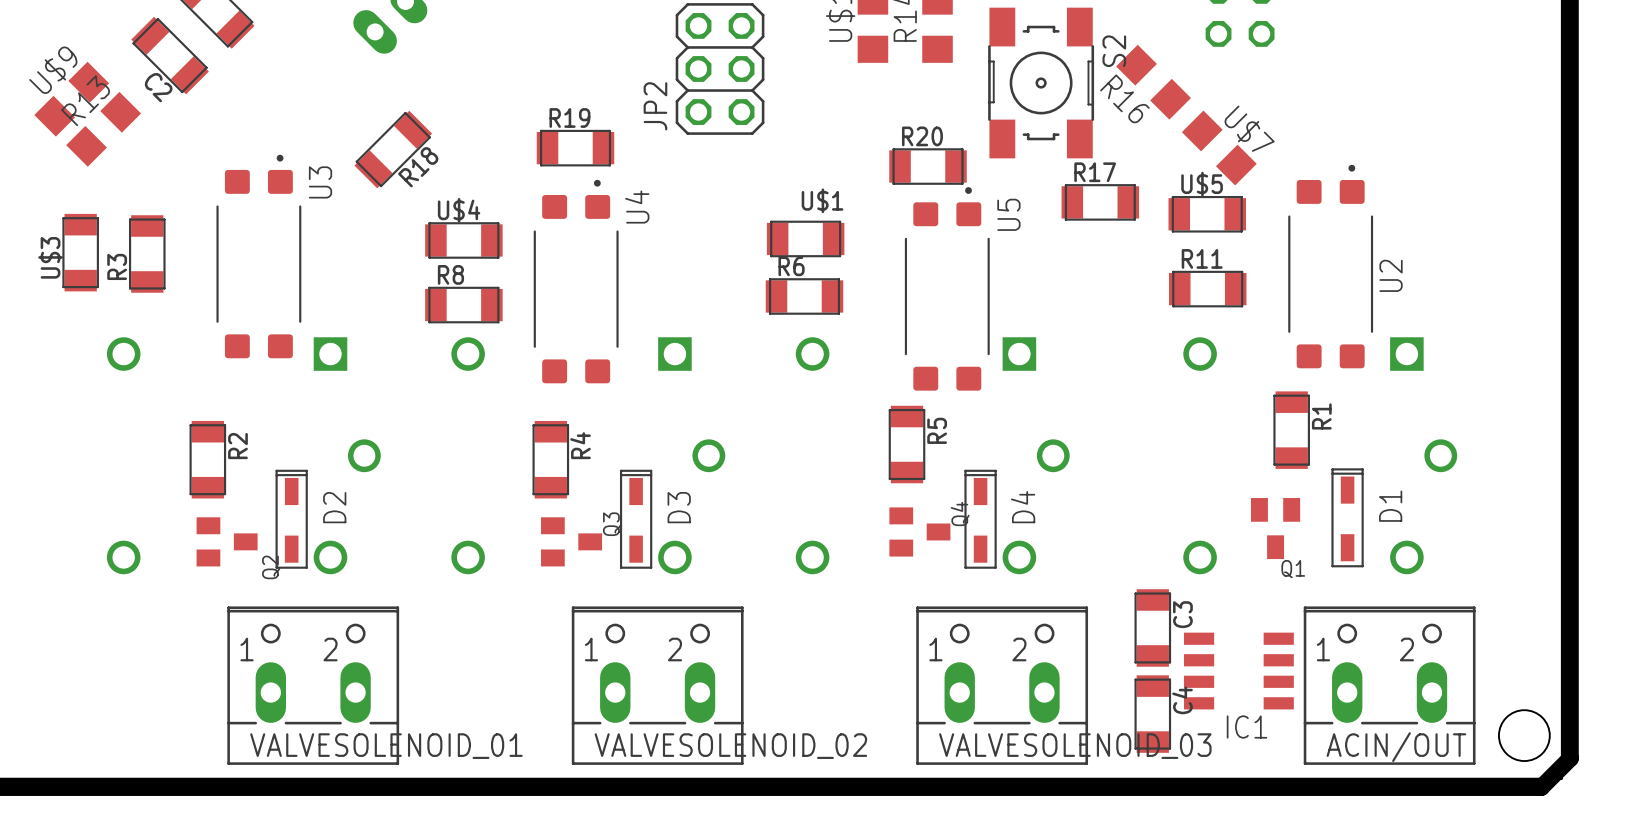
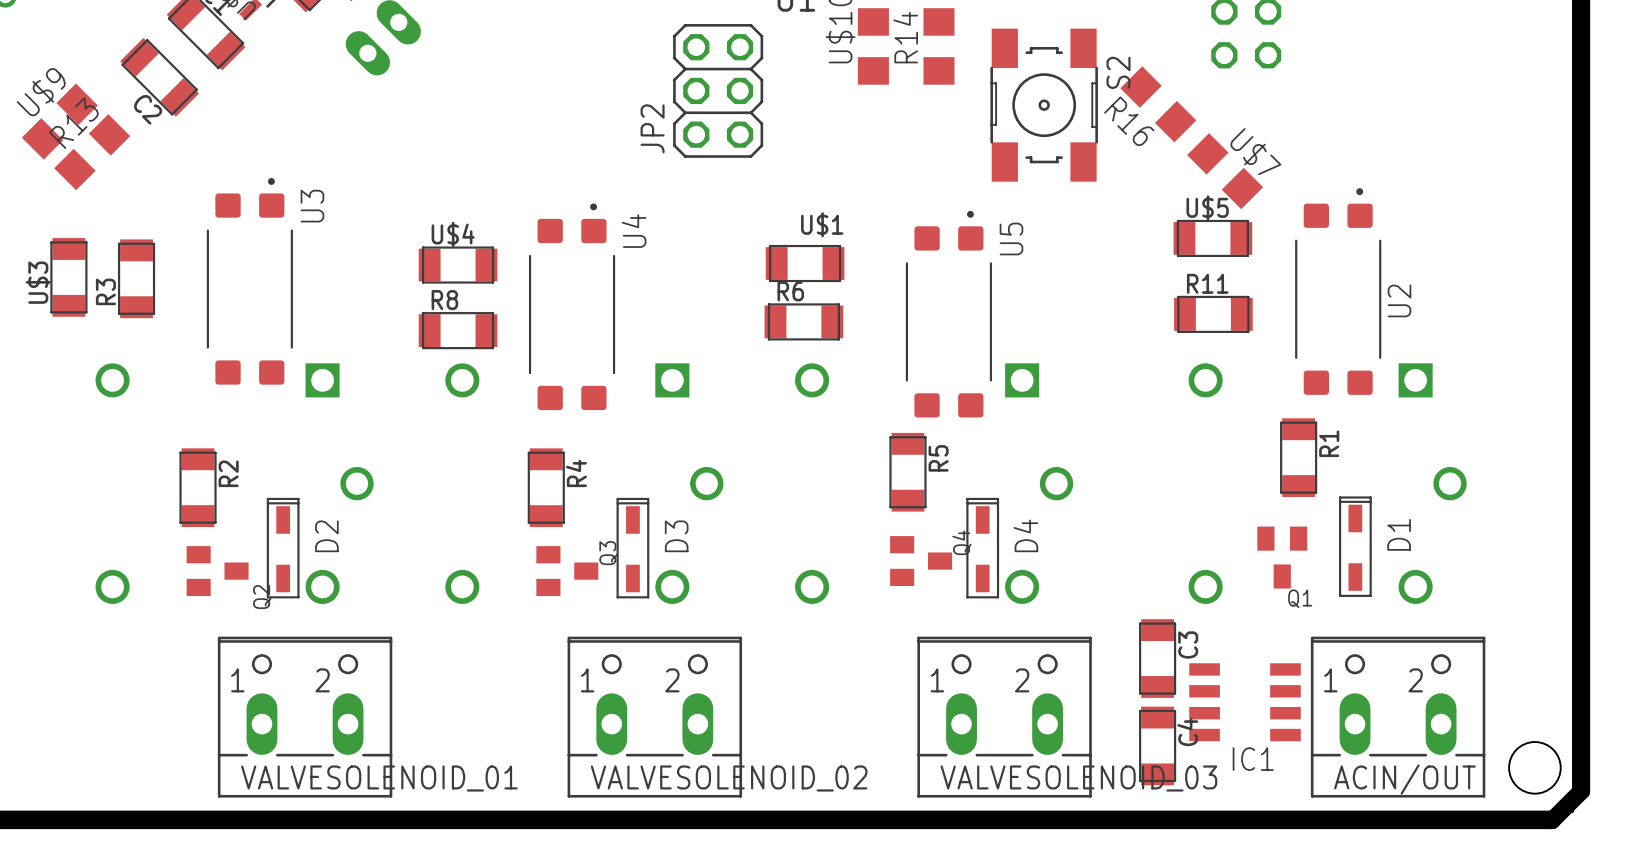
R19: (575, 148) -> none
R18: (393, 149) -> none
R20: (928, 166) -> none
R17: (1100, 202) -> none

